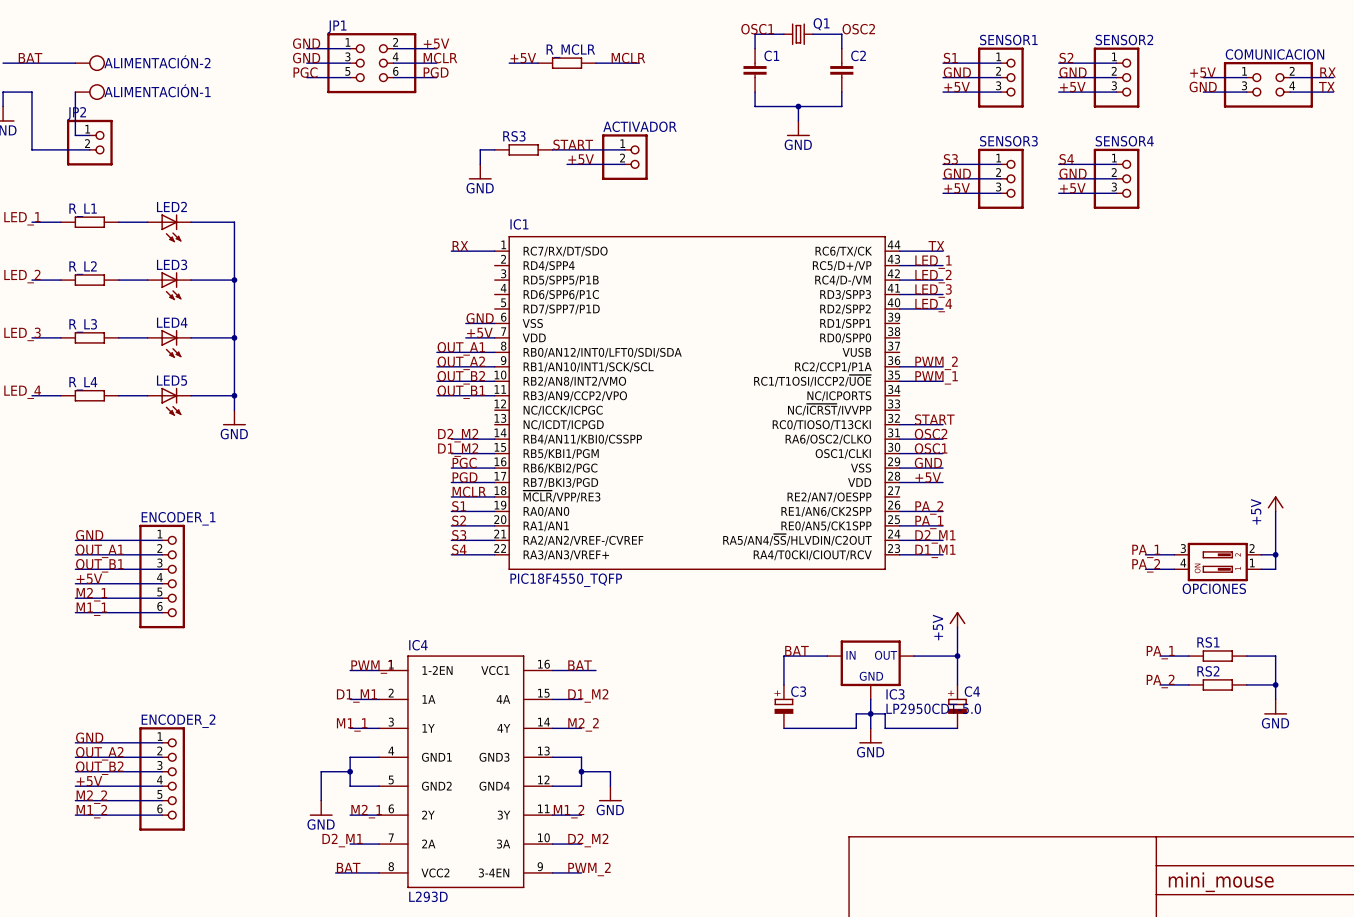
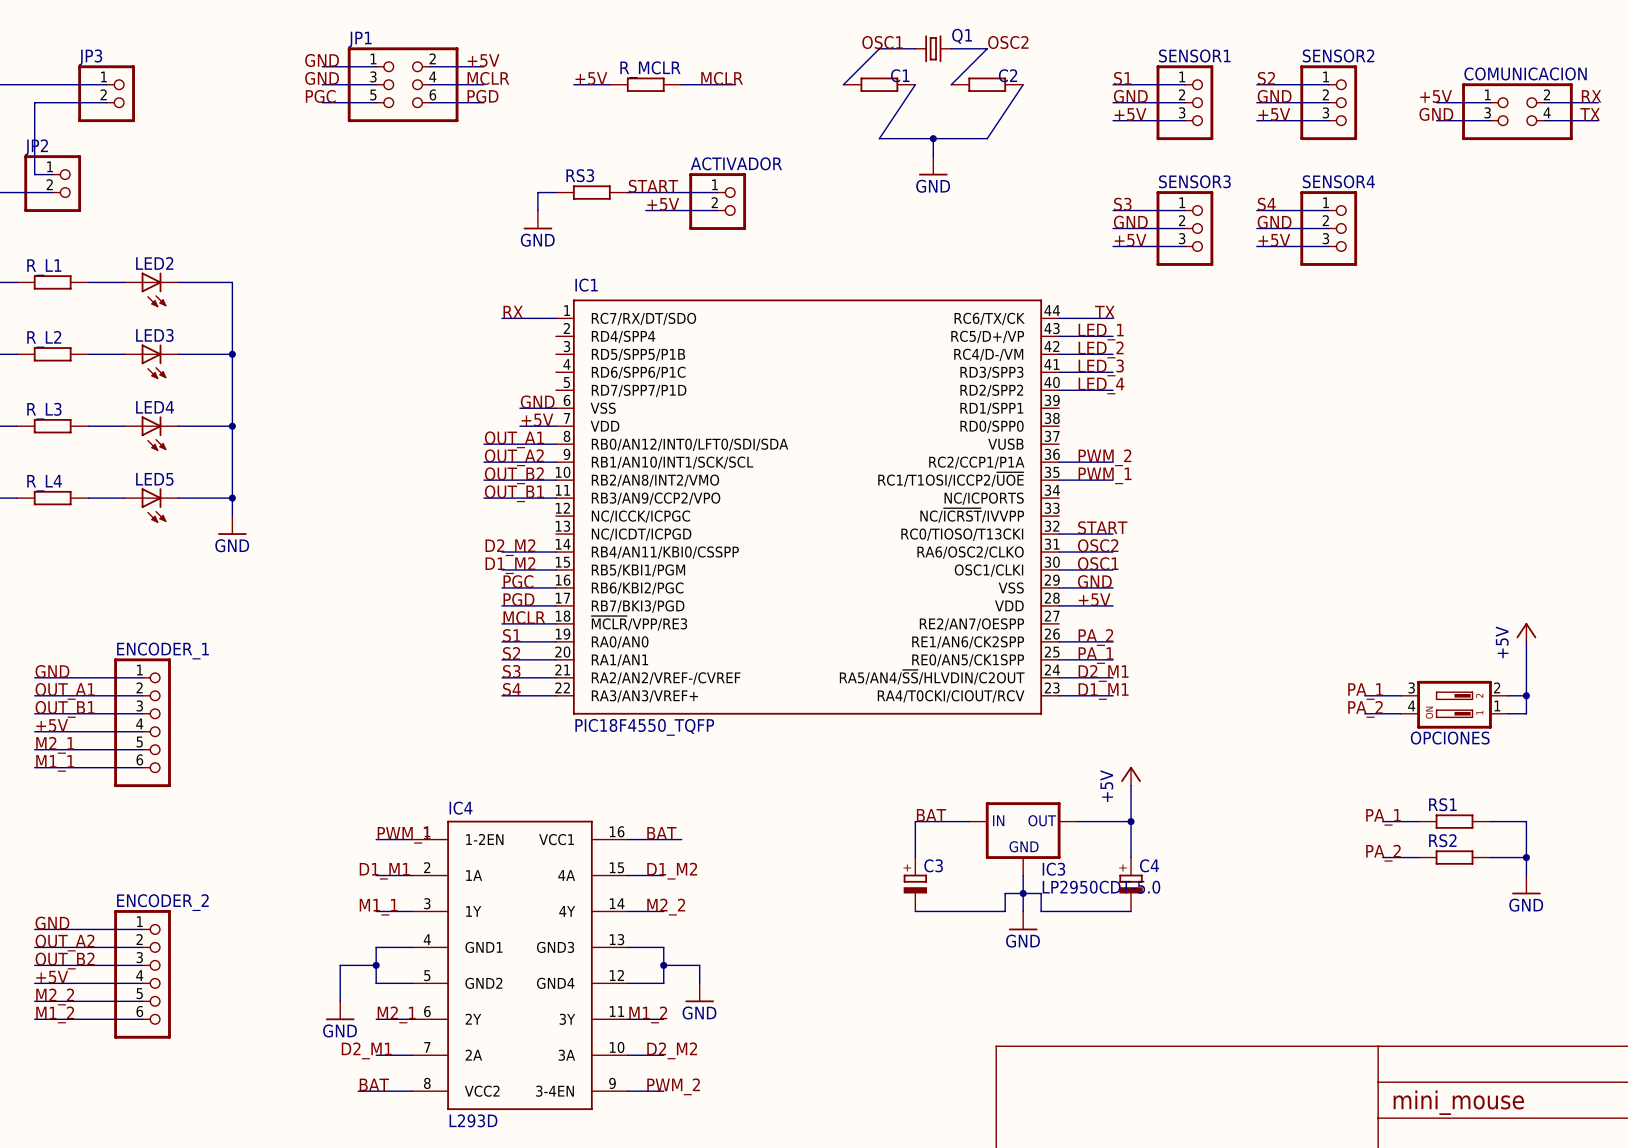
wire: (755, 34) (755, 48) -> (879, 48) (843, 84)
wire: (841, 34) (841, 48) -> (987, 48) (951, 84)
C1 symbol: [743, 48, 767, 93] -> [843, 77, 916, 92]
C2 symbol: [830, 48, 854, 93] -> [951, 77, 1024, 92]
wire: none -> (34, 84) (106, 84)
ALIMENTACIÓN-2: (90, 63) -> none
JP3: none -> (106, 93)
wire: none -> (106, 102) (34, 102) (34, 120)
ALIMENTACIÓN-1: (90, 92) -> none
wire: (755, 92) (755, 106) -> (915, 84) (879, 138)
wire: (841, 92) (841, 106) -> (1023, 84) (987, 138)

